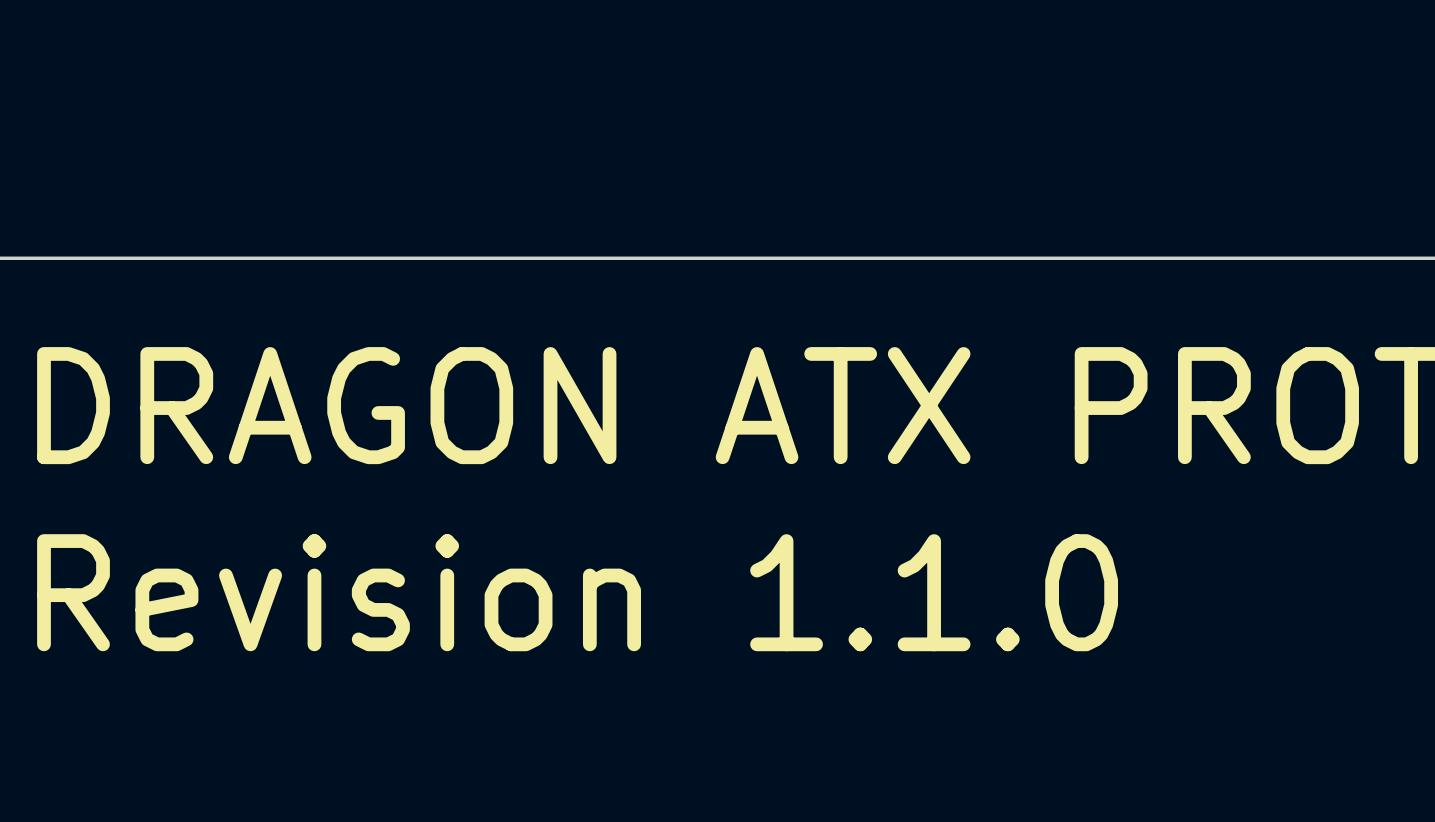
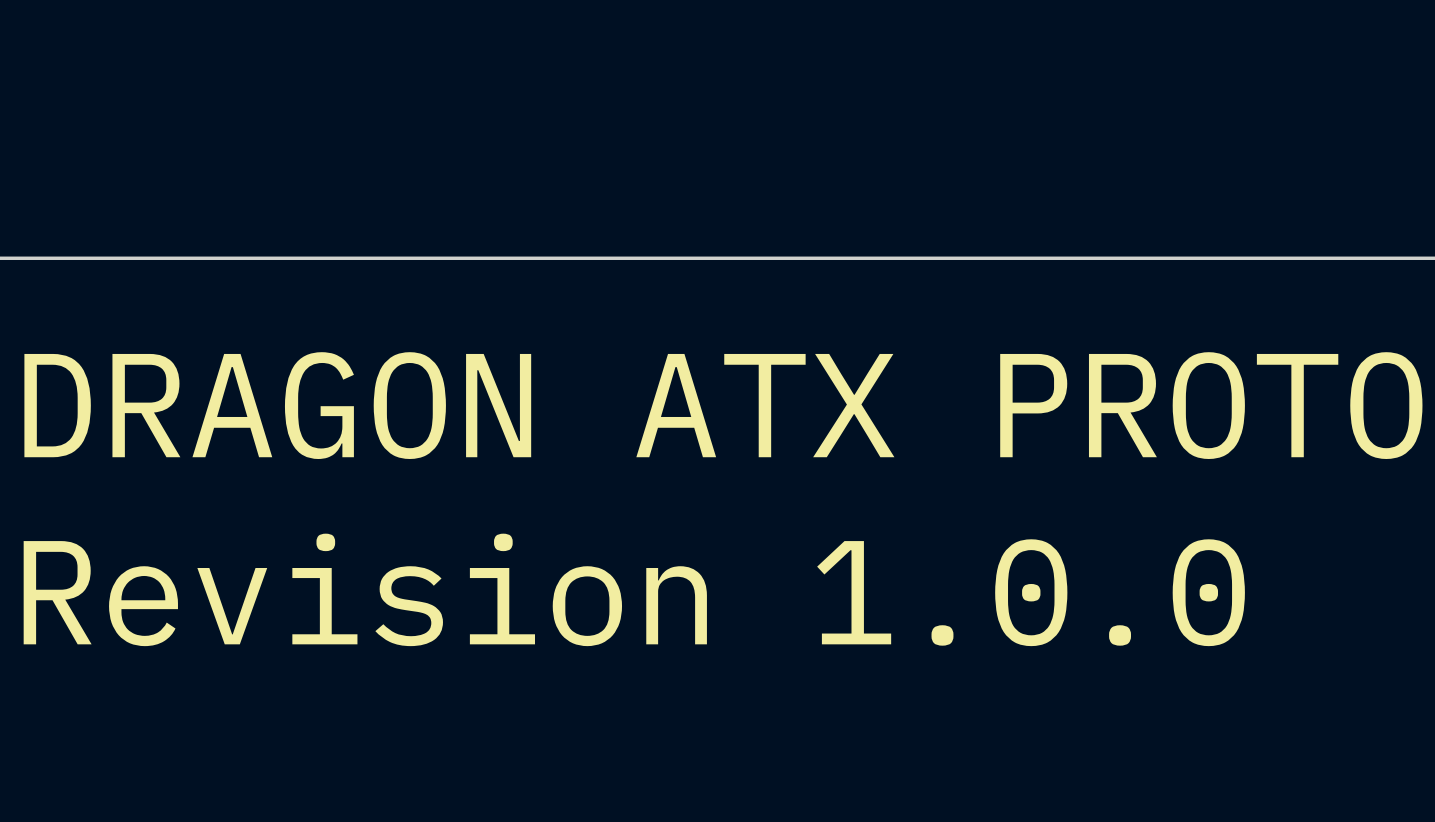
text: Revision 1.1.0 (577, 592) -> Revision 1.0.0 (634, 589)

